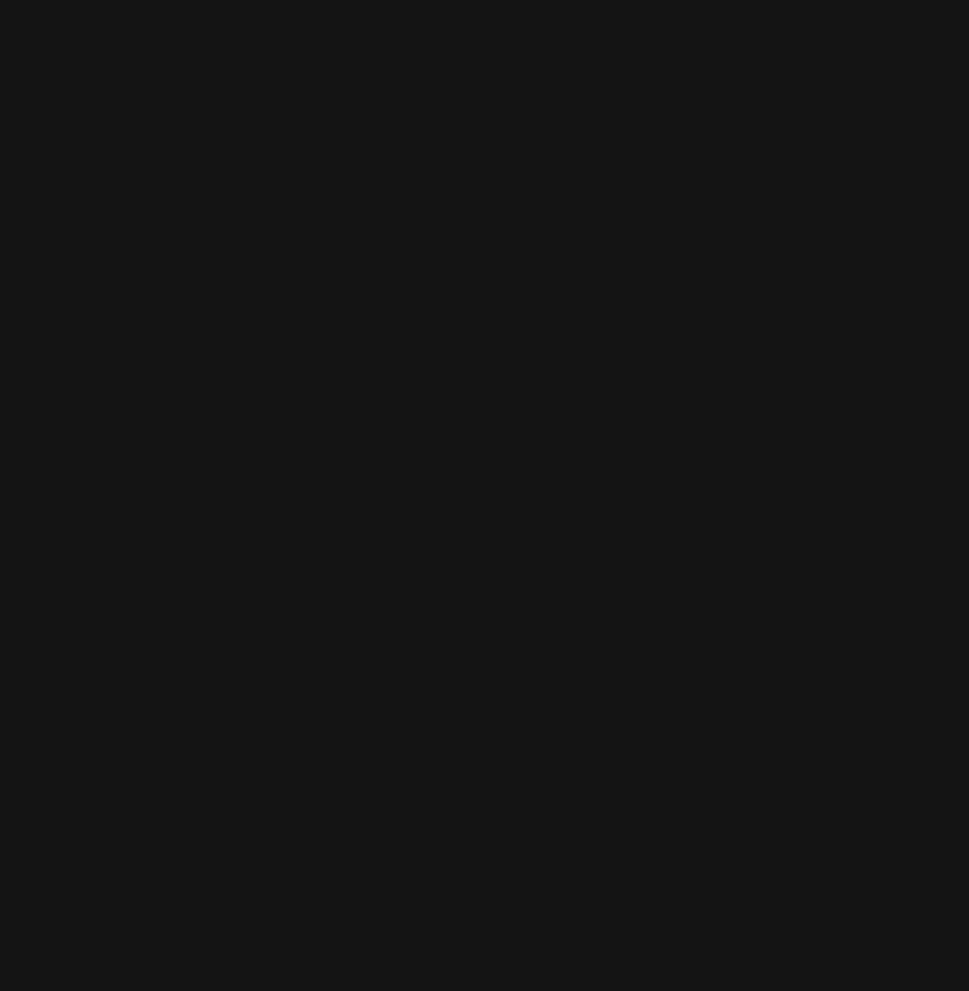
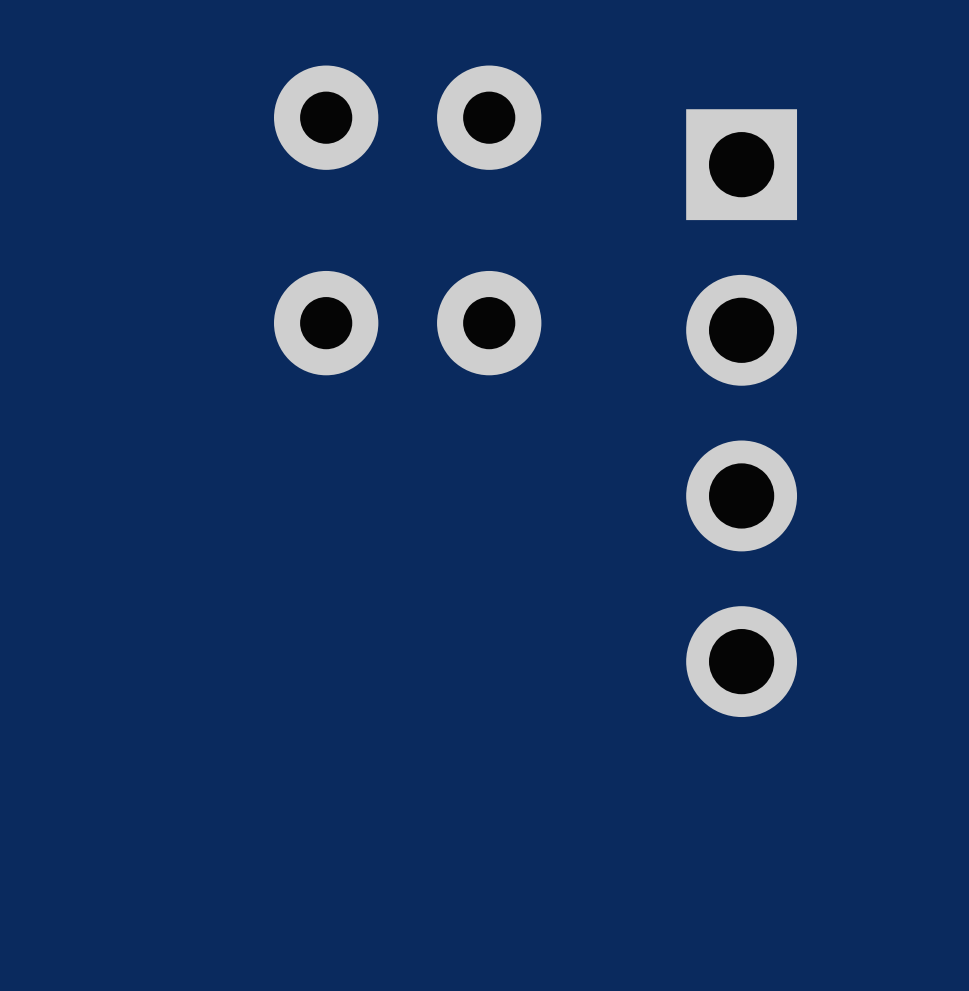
part: none -> (407, 117)
part: none -> (407, 323)
part: none -> (741, 413)

